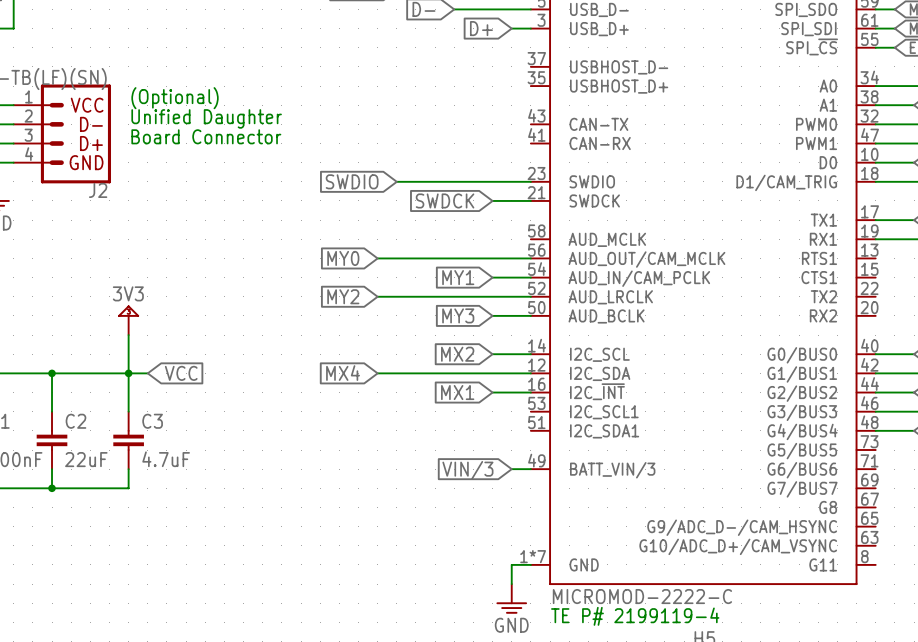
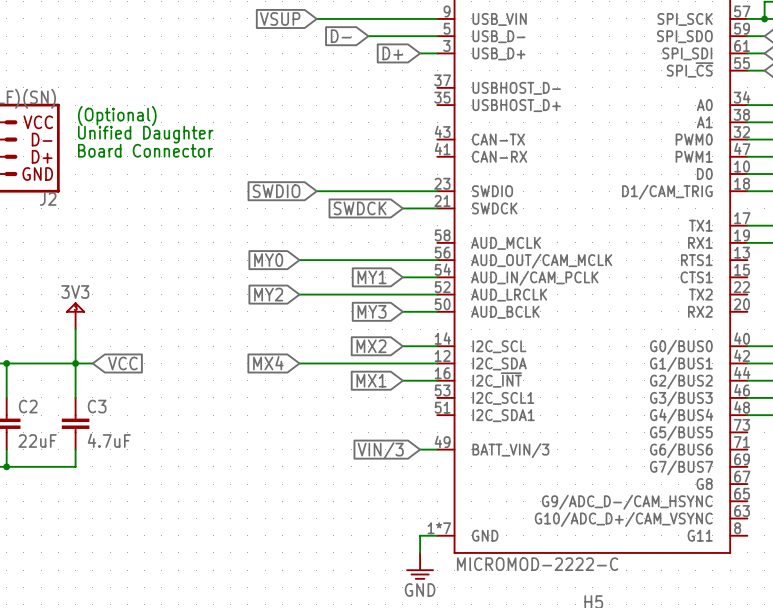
text: TE P# 2199119-4 (635, 616) -> none

